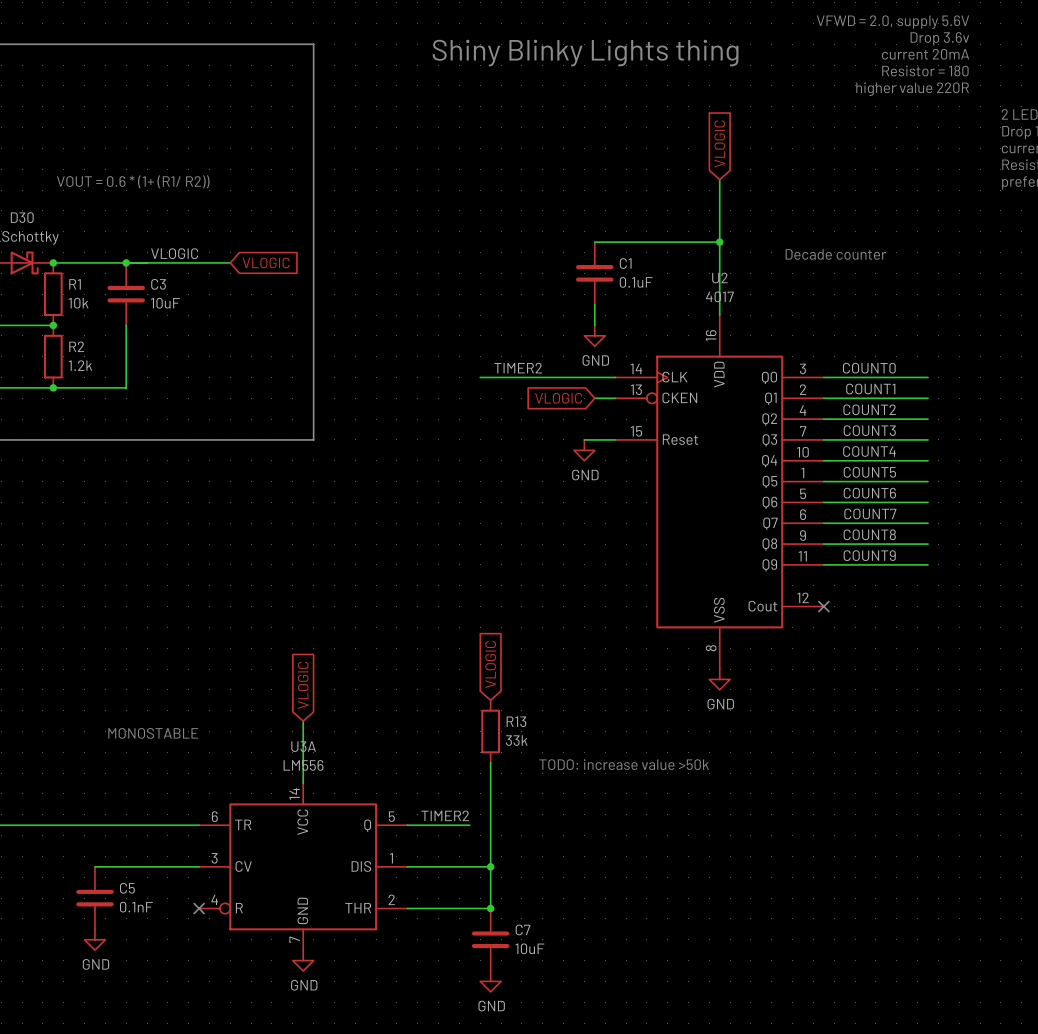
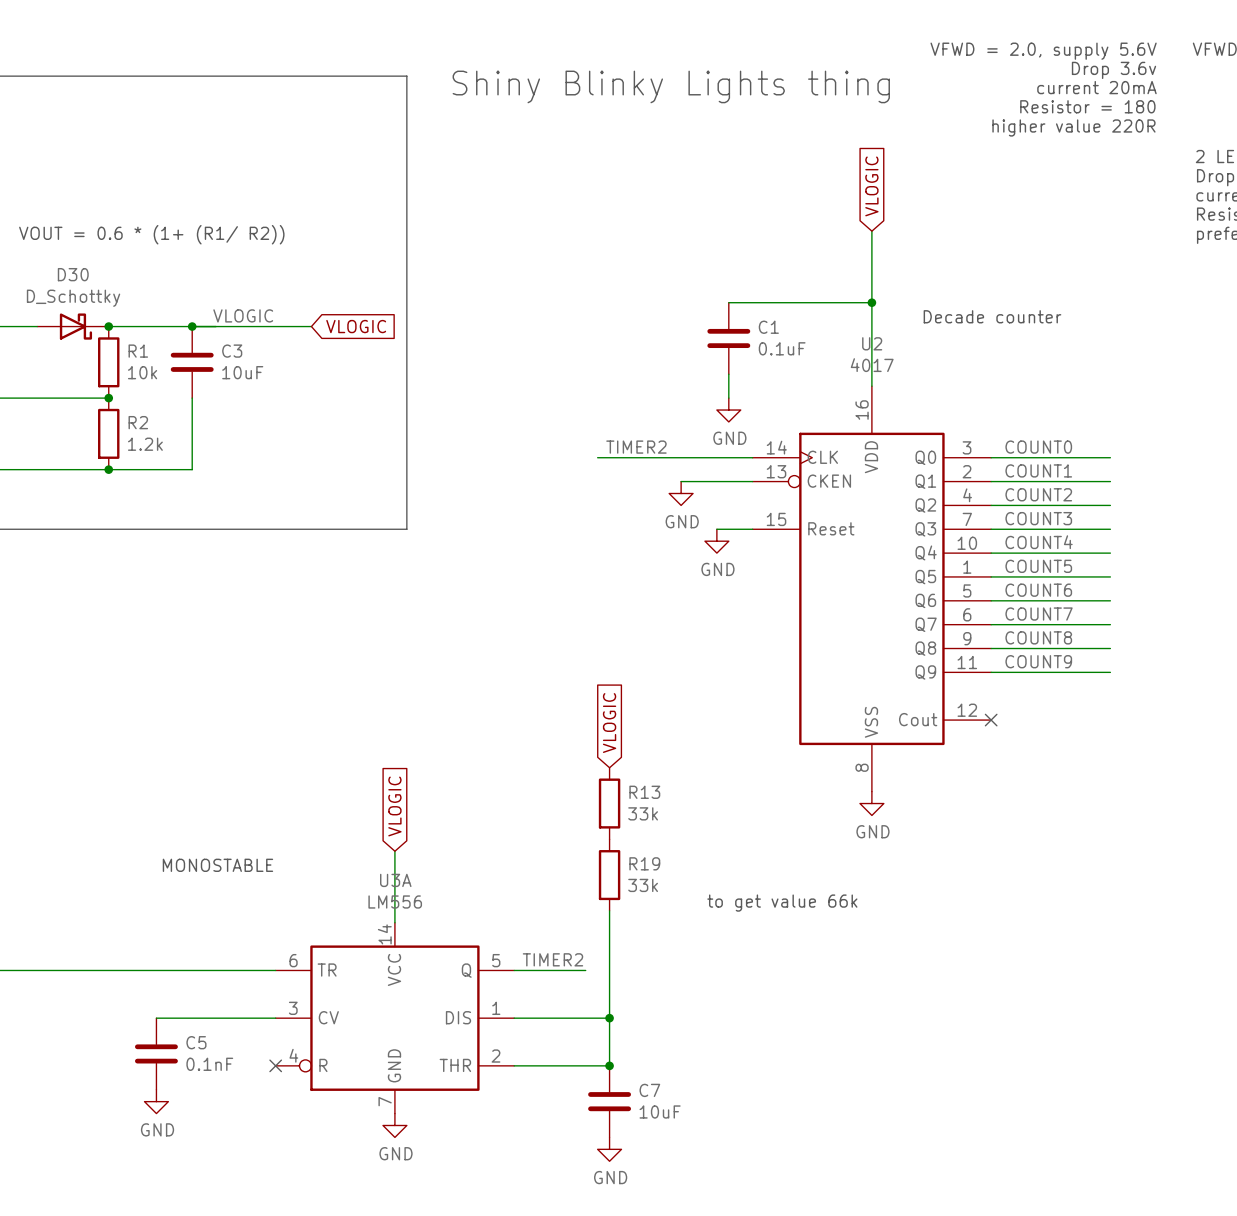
wire: none -> (681, 481) (728, 481)
global label: VLOGIC (558, 398) -> none
power symbol: none -> GND (681, 493)
global label position: VLOGIC (490, 664) -> VLOGIC (609, 723)
R13 position: (490, 731) -> (609, 803)
R19: none -> 33k (609, 875)
text: TODO: increase value >50k (624, 764) -> to get value 66k (782, 903)

